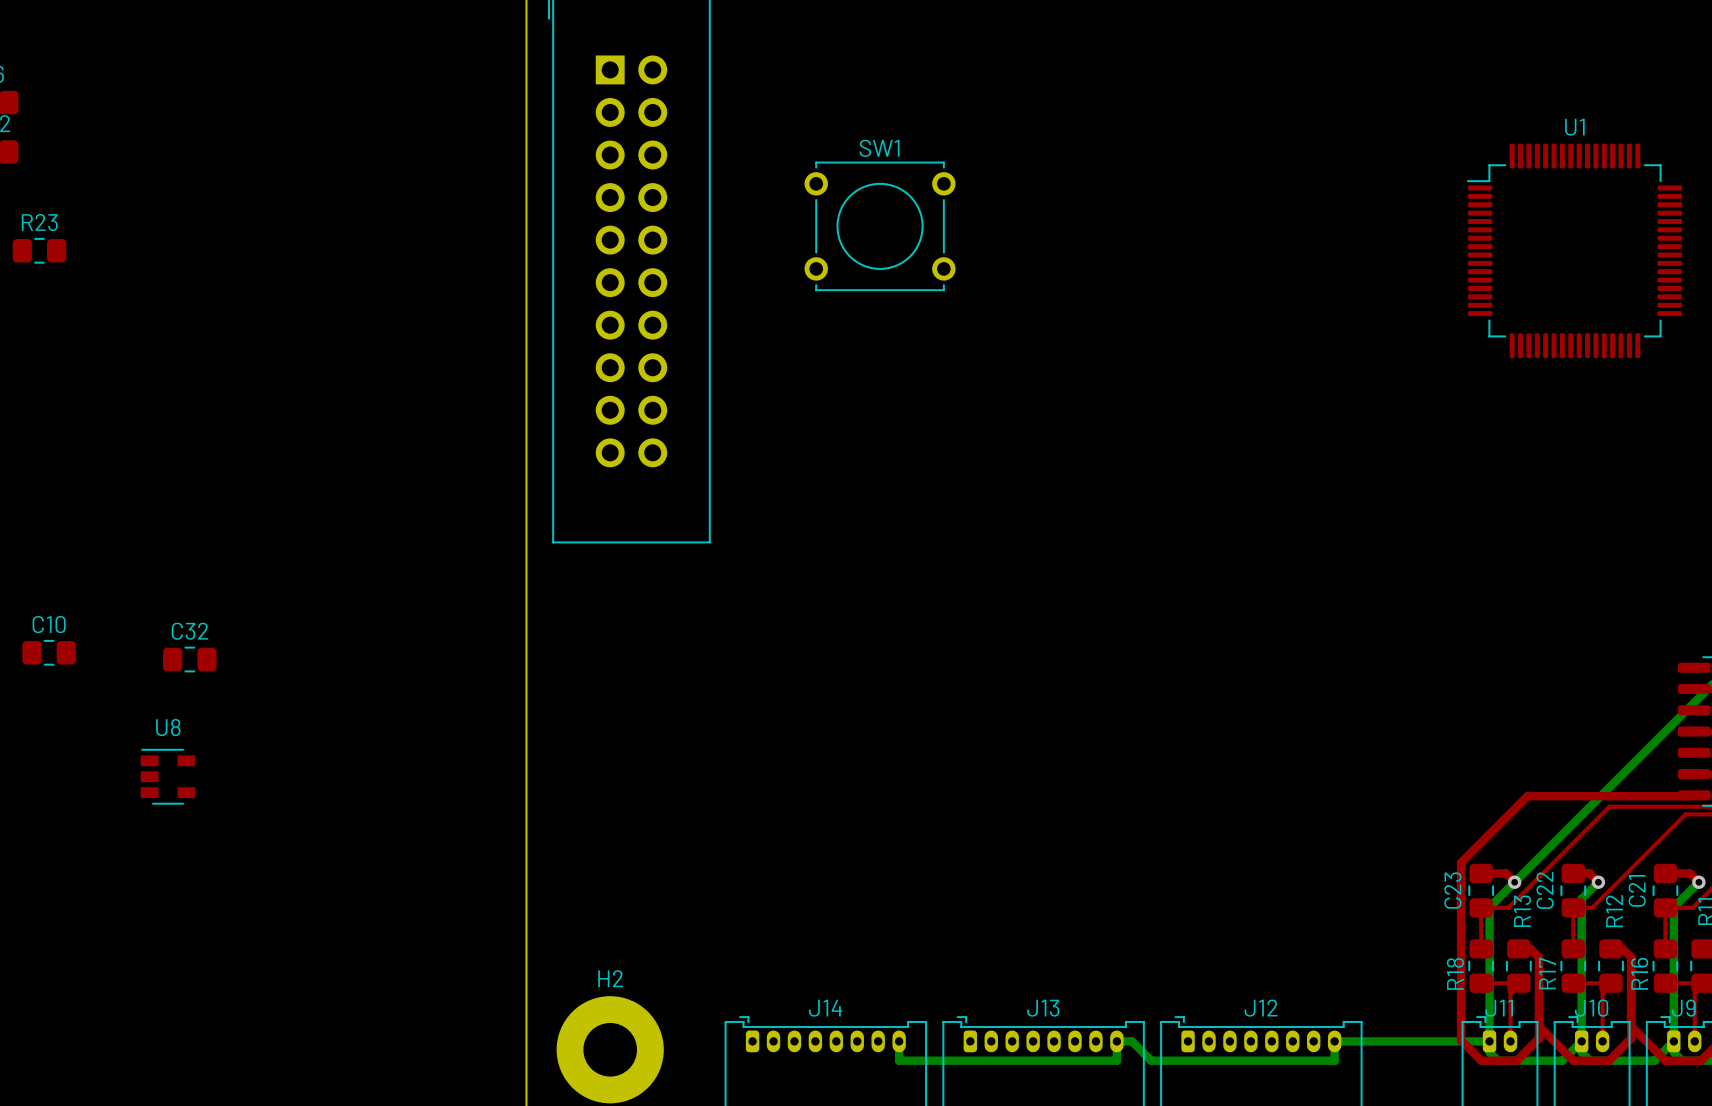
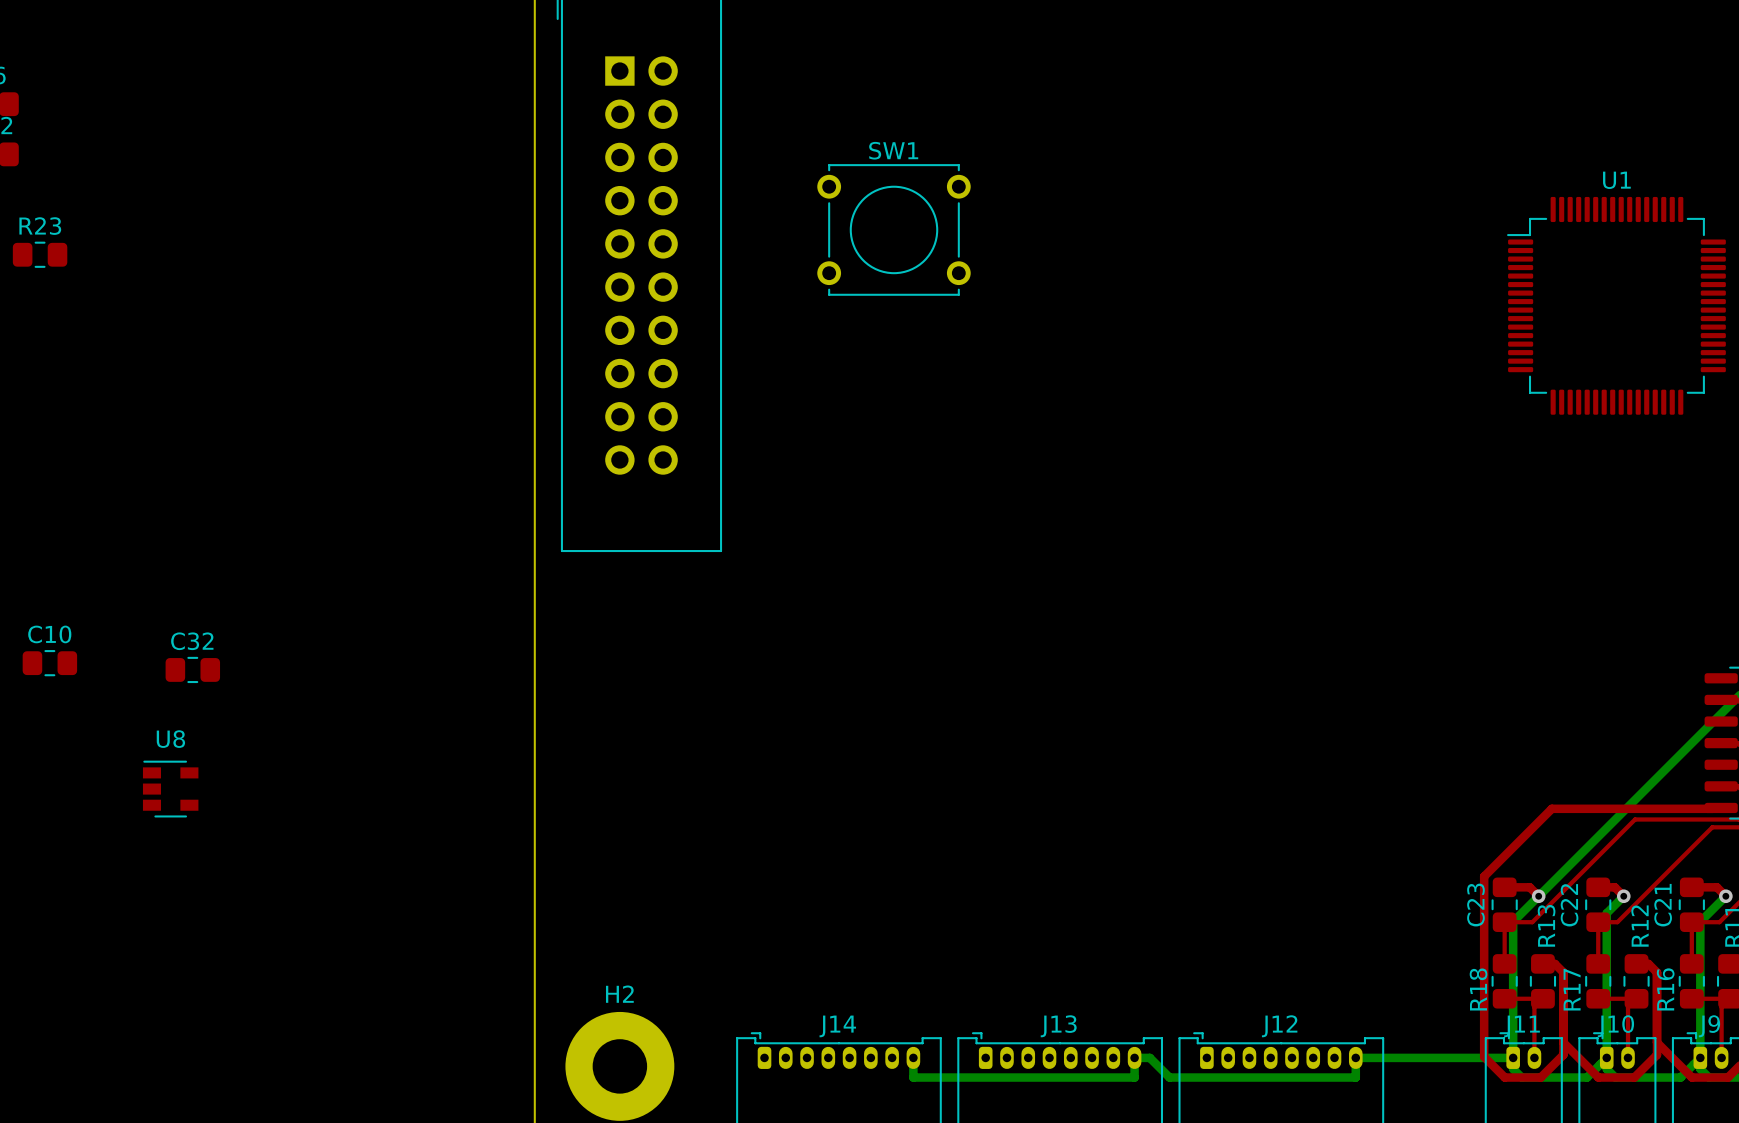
U1 position: (1574, 250) -> (1616, 305)

